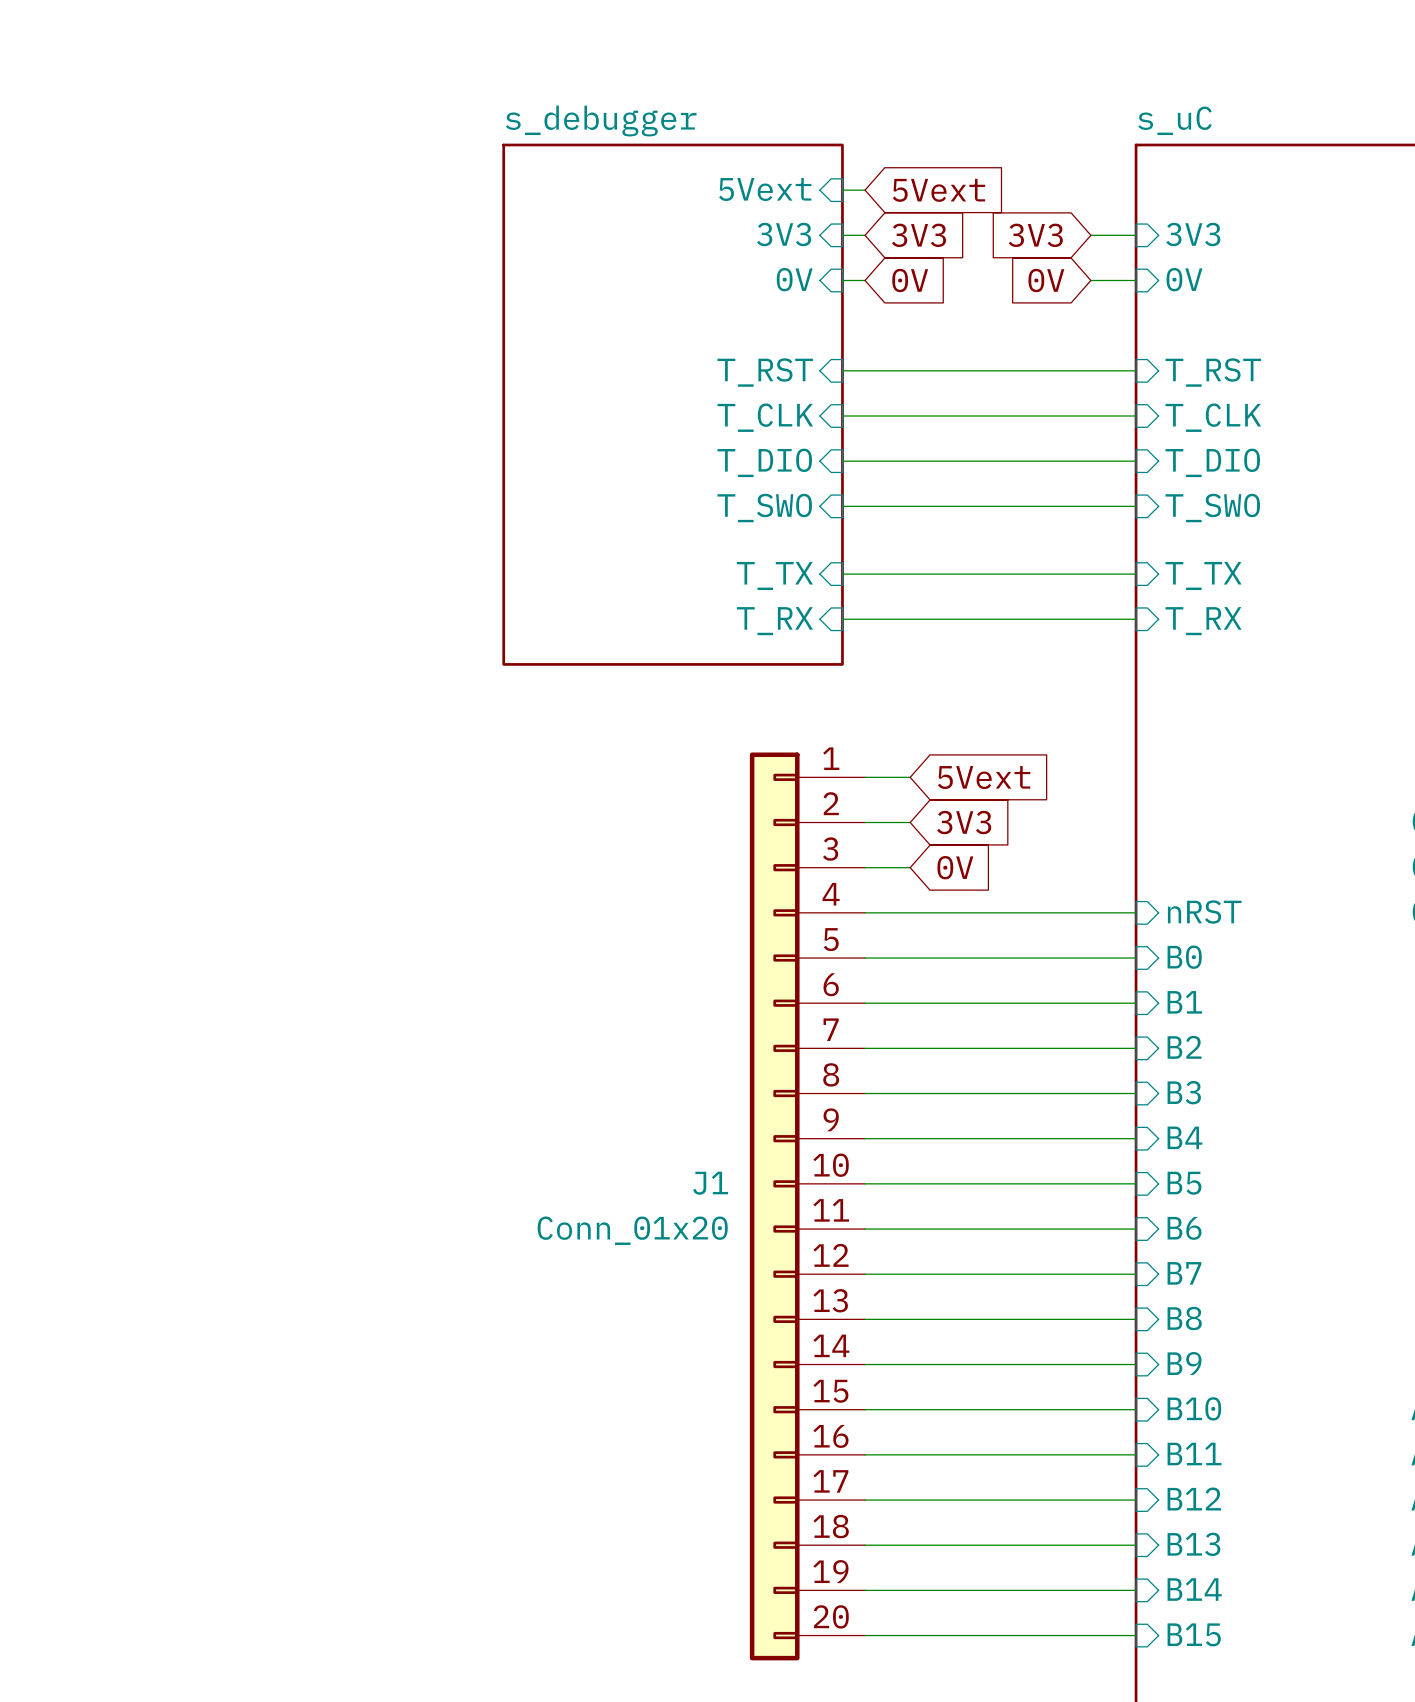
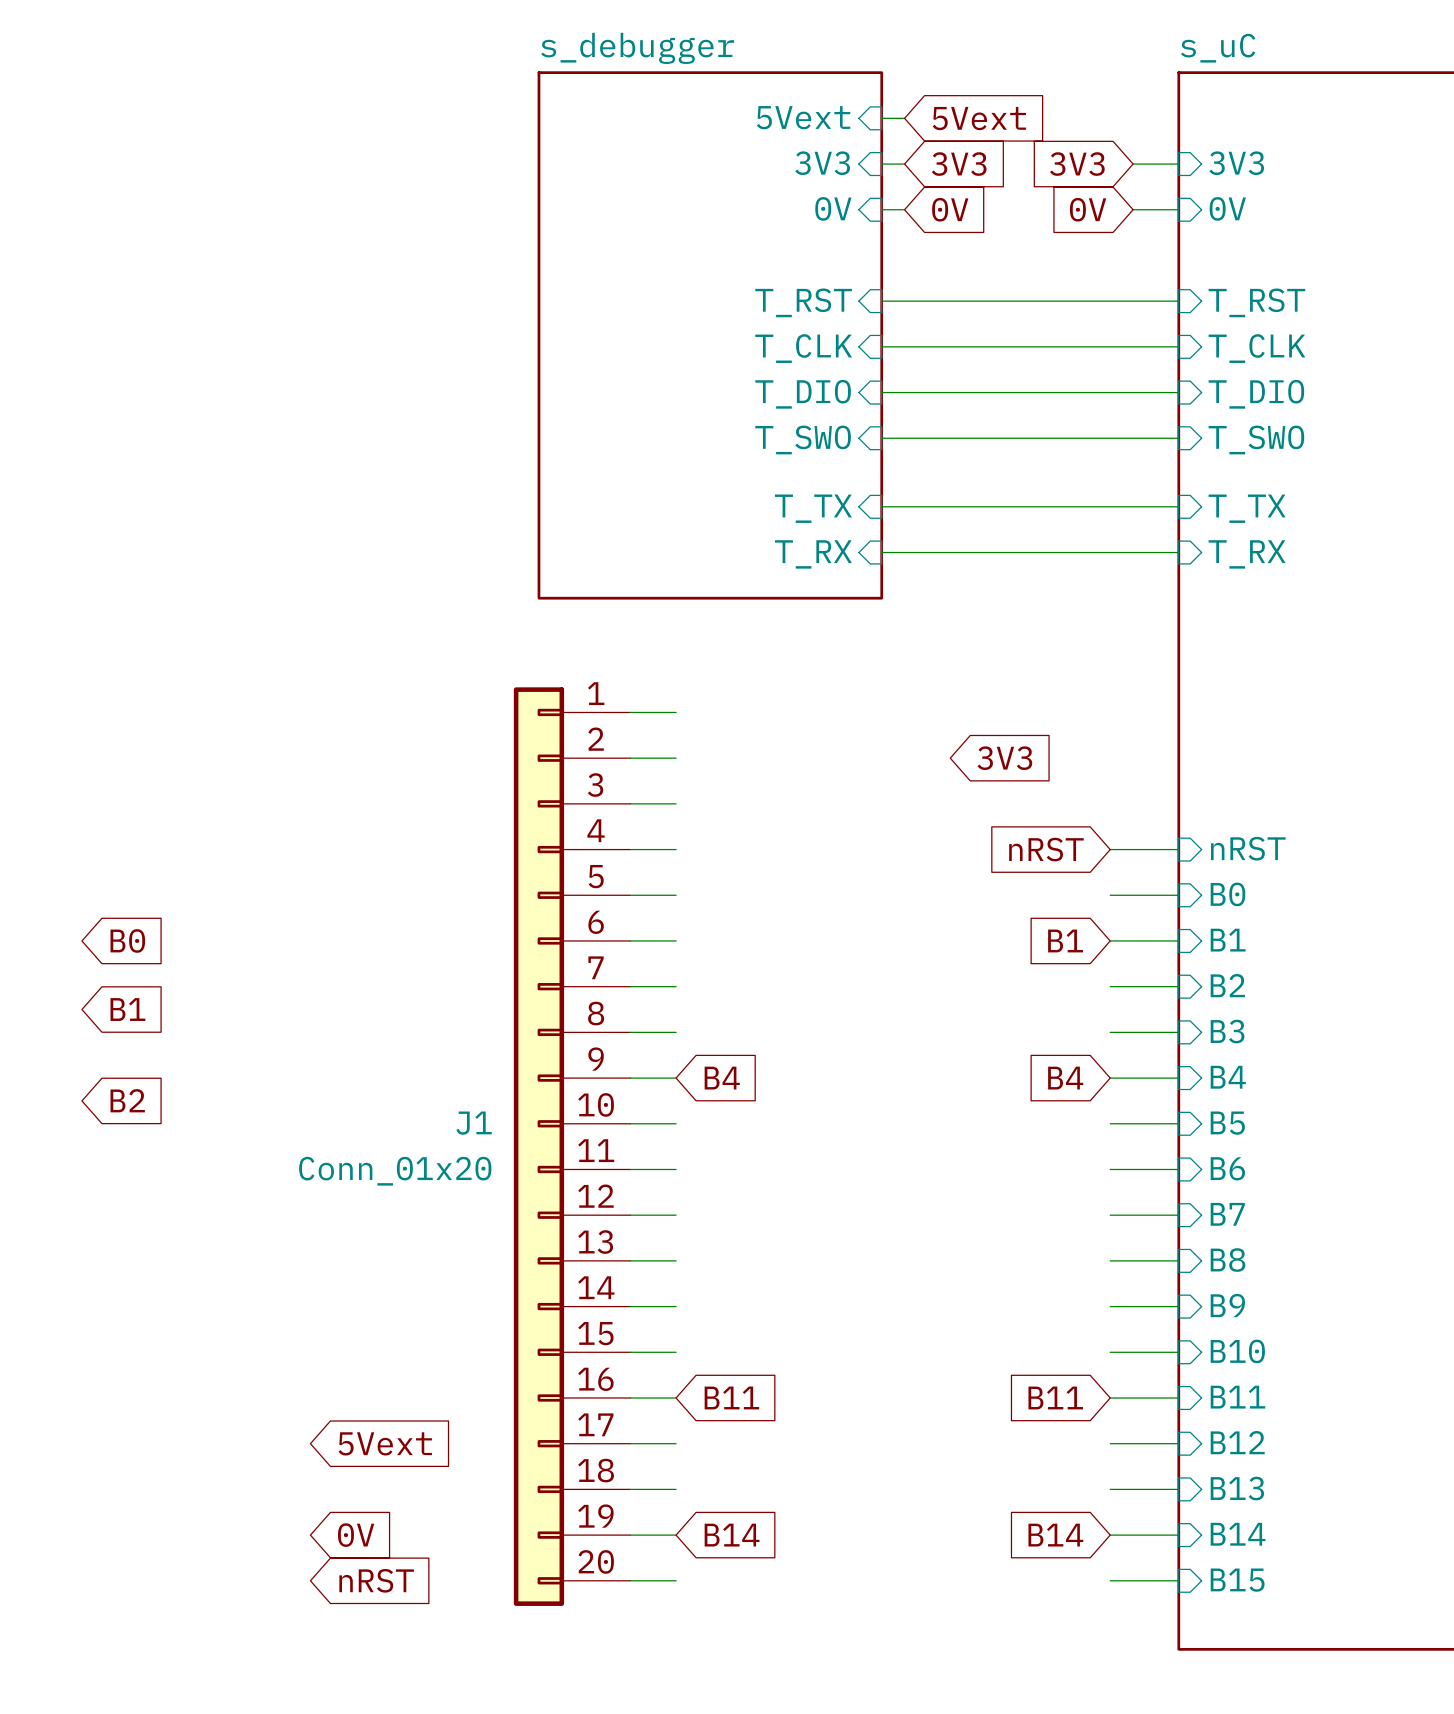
wire: (865, 777) (910, 777) -> (630, 712) (676, 712)
global label: 5Vext (984, 777) -> none
wire: (865, 822) (910, 822) -> (630, 758) (676, 758)
wire: (865, 867) (910, 867) -> (630, 803) (676, 803)
global label: 0V (955, 867) -> none
wire: none -> (630, 849) (676, 849)
wire: (865, 912) (1068, 912) -> none
global label: none -> nRST (1046, 849)
wire: none -> (630, 895) (676, 895)
wire: (865, 958) (1068, 958) -> none
global label: none -> B0 (127, 940)
wire: none -> (630, 940) (676, 940)
wire: (865, 1003) (1068, 1003) -> none
global label: none -> B1 (1065, 940)
wire: none -> (630, 986) (676, 986)
wire: (865, 1048) (1068, 1048) -> none
global label: none -> B1 (127, 1009)
wire: none -> (630, 1032) (676, 1032)
wire: (865, 1093) (1068, 1093) -> none
wire: none -> (630, 1078) (676, 1078)
global label: none -> B4 (722, 1078)
wire: (865, 1138) (1068, 1138) -> none
global label: none -> B4 (1065, 1078)
global label: none -> B2 (127, 1100)
wire: none -> (630, 1123) (676, 1123)
wire: (865, 1183) (1068, 1183) -> none
J1 position: (807, 1206) -> (572, 1146)
wire: none -> (630, 1169) (676, 1169)
wire: (865, 1229) (1068, 1229) -> none
wire: none -> (630, 1215) (676, 1215)
wire: (865, 1274) (1068, 1274) -> none
wire: none -> (630, 1260) (676, 1260)
wire: (865, 1319) (1068, 1319) -> none
wire: none -> (630, 1306) (676, 1306)
wire: (865, 1364) (1068, 1364) -> none
wire: none -> (630, 1352) (676, 1352)
wire: (865, 1409) (1068, 1409) -> none
wire: none -> (630, 1397) (676, 1397)
global label: none -> B11 (731, 1397)
wire: (865, 1454) (1068, 1454) -> none
global label: none -> B11 (1055, 1397)
global label: none -> 5Vext (385, 1443)
wire: none -> (630, 1443) (676, 1443)
wire: (865, 1500) (1068, 1500) -> none
wire: none -> (630, 1489) (676, 1489)
wire: (865, 1545) (1068, 1545) -> none
global label: none -> 0V (356, 1535)
wire: none -> (630, 1535) (676, 1535)
global label: none -> B14 (732, 1535)
wire: (865, 1590) (1068, 1590) -> none
global label: none -> B14 (1055, 1535)
global label: none -> nRST (376, 1580)
wire: none -> (630, 1580) (676, 1580)
wire: (865, 1635) (1068, 1635) -> none

